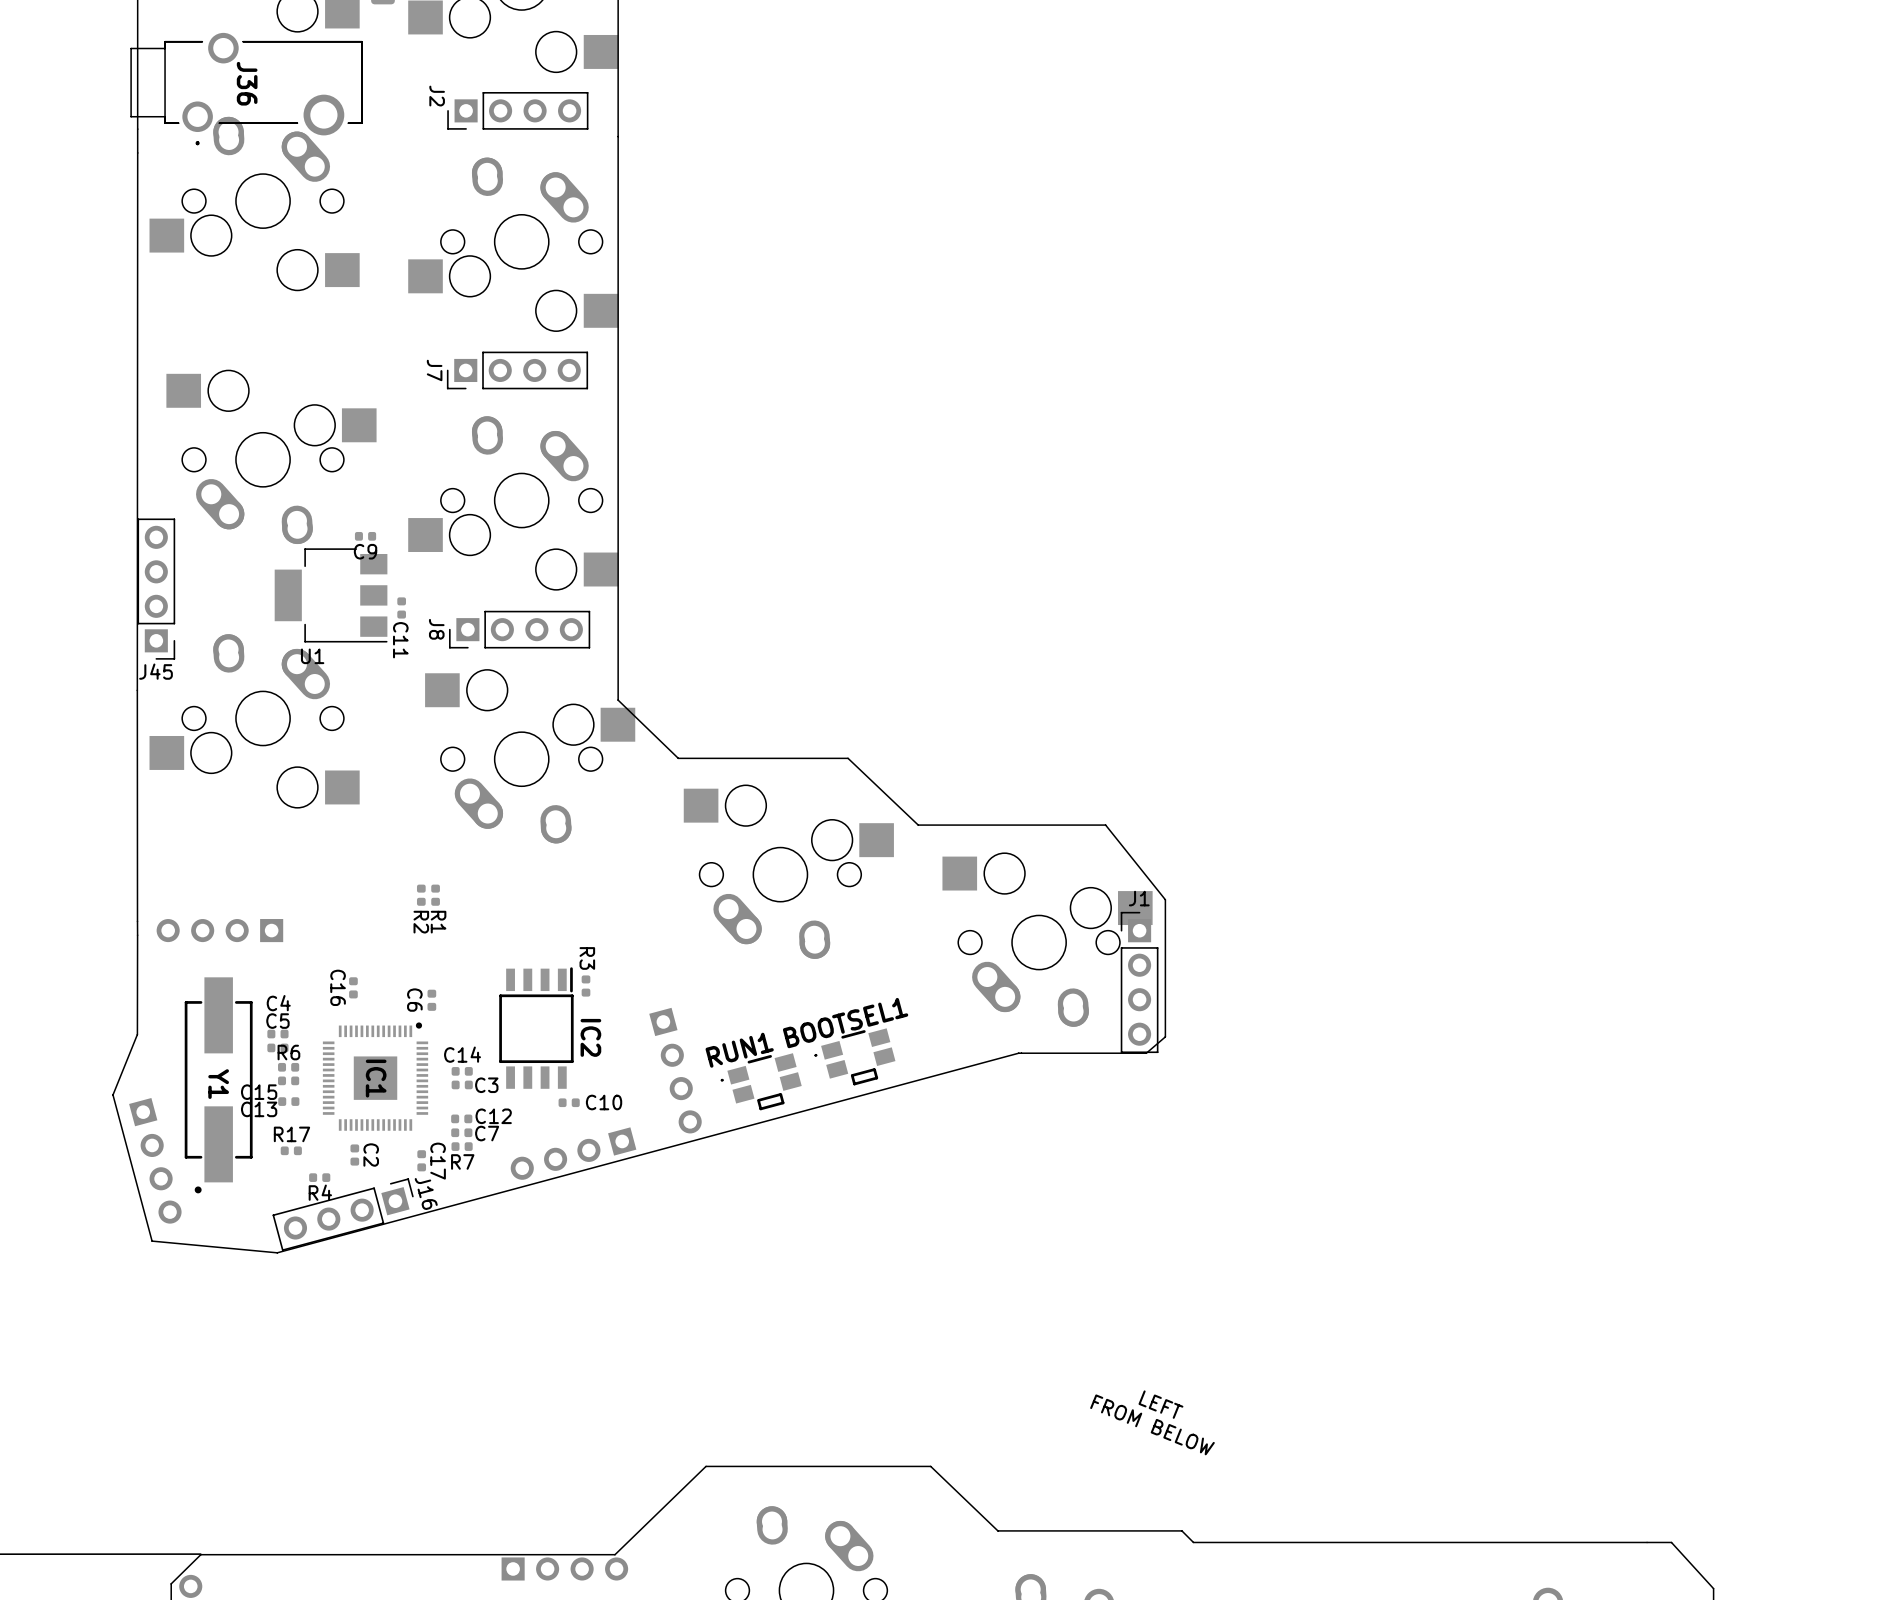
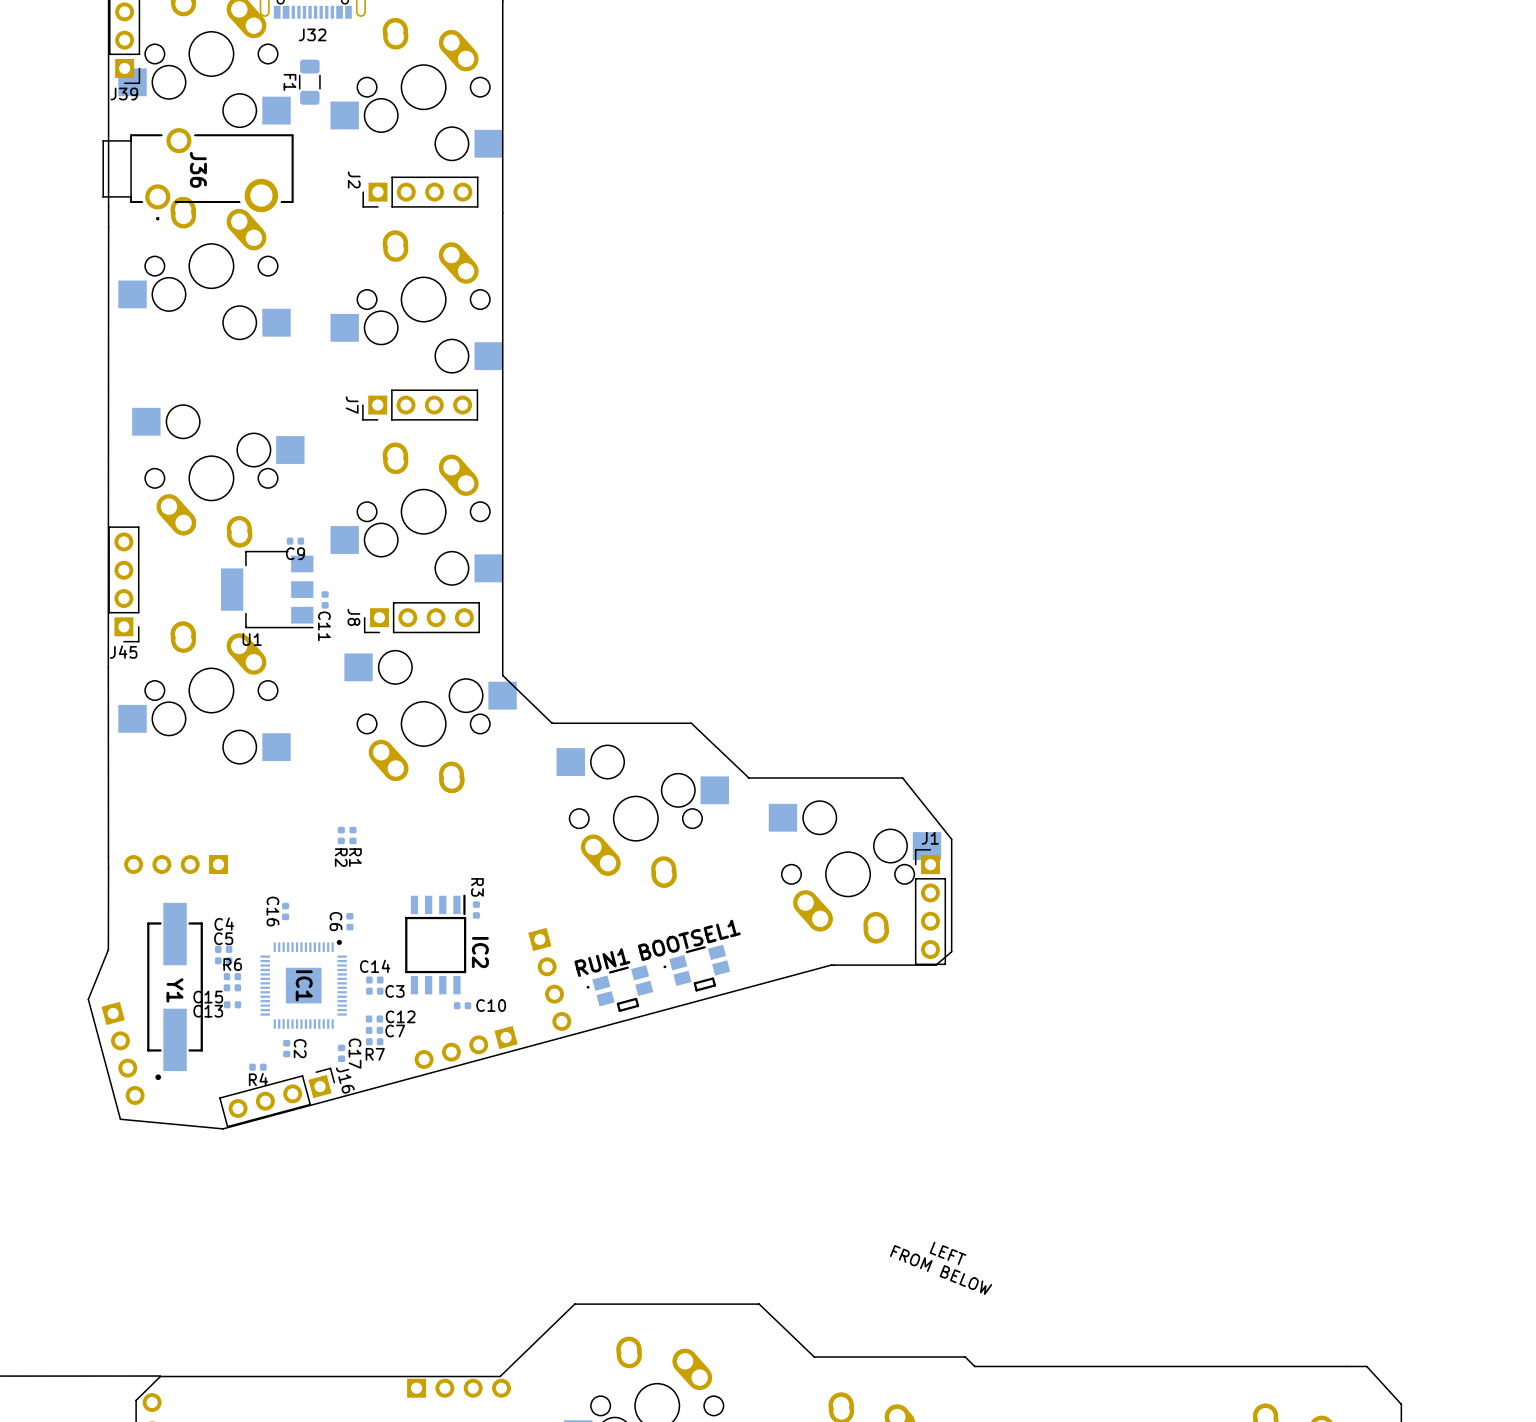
R17: (291, 1150) -> none

